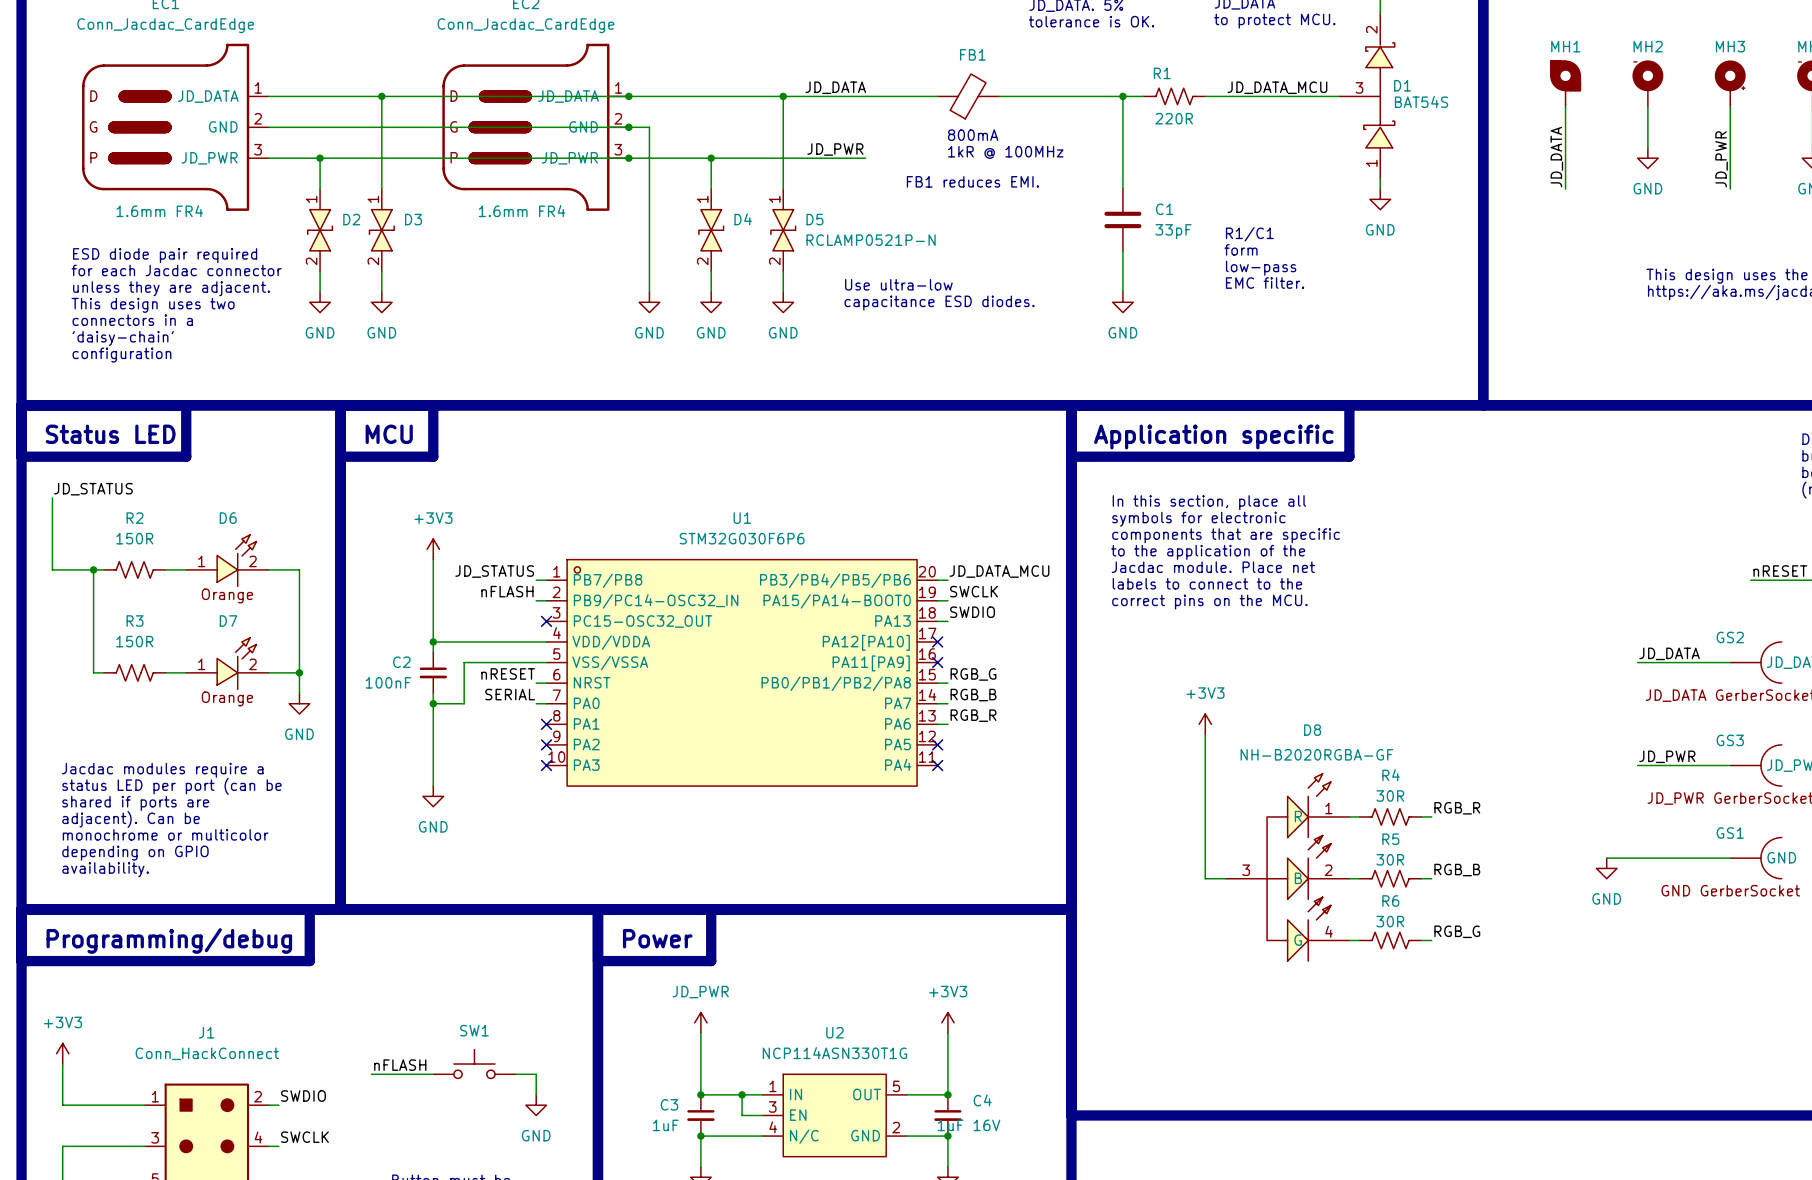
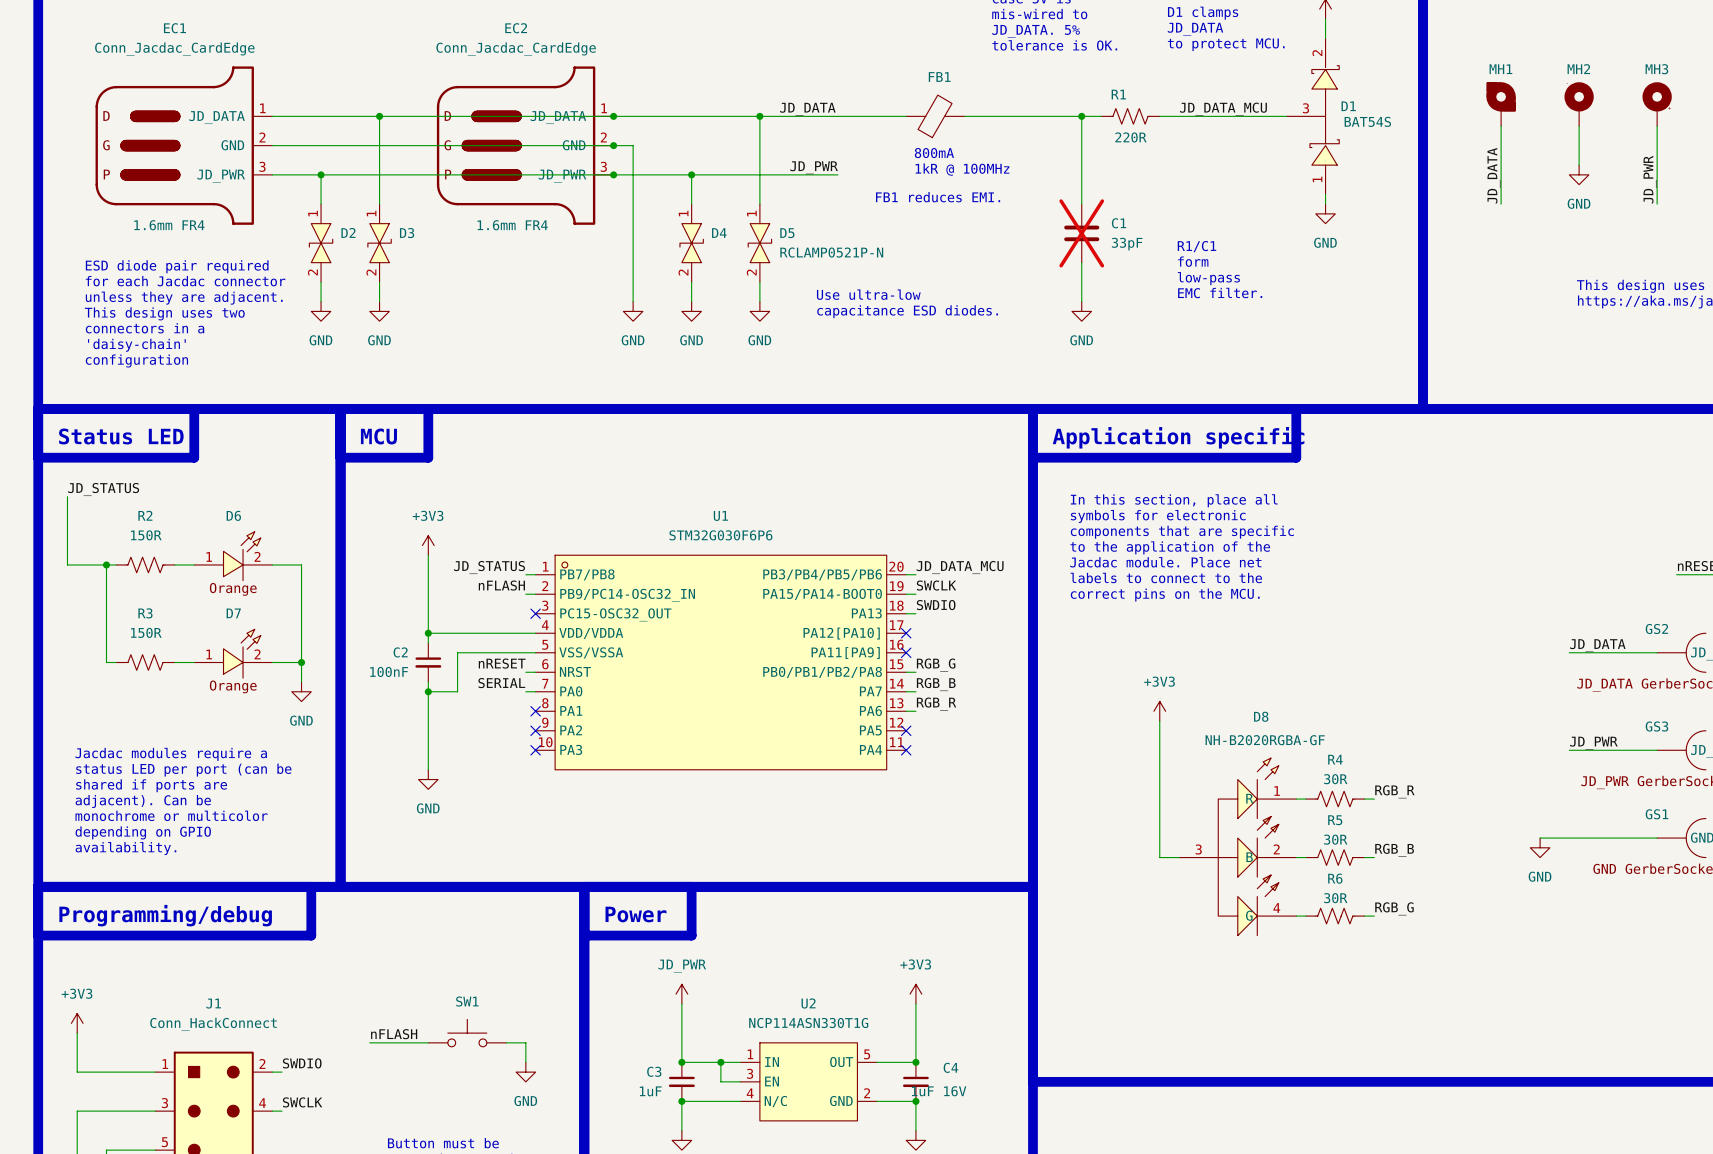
C1 do-not-place cross: none -> (1081, 233)

